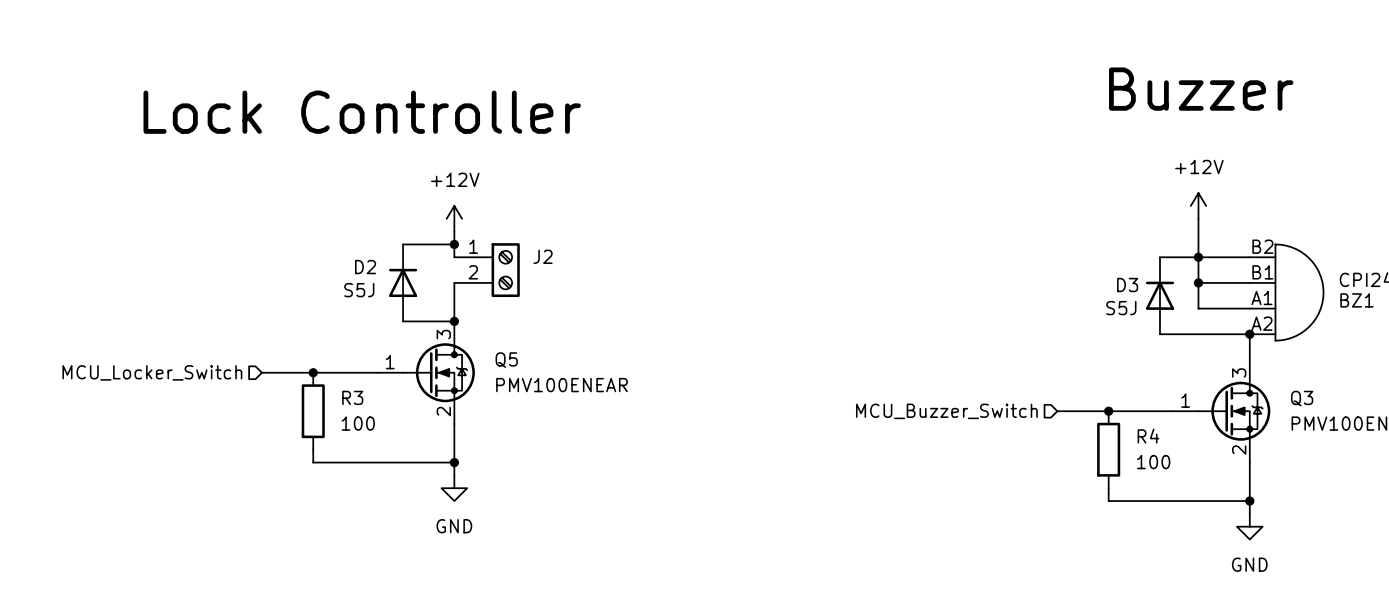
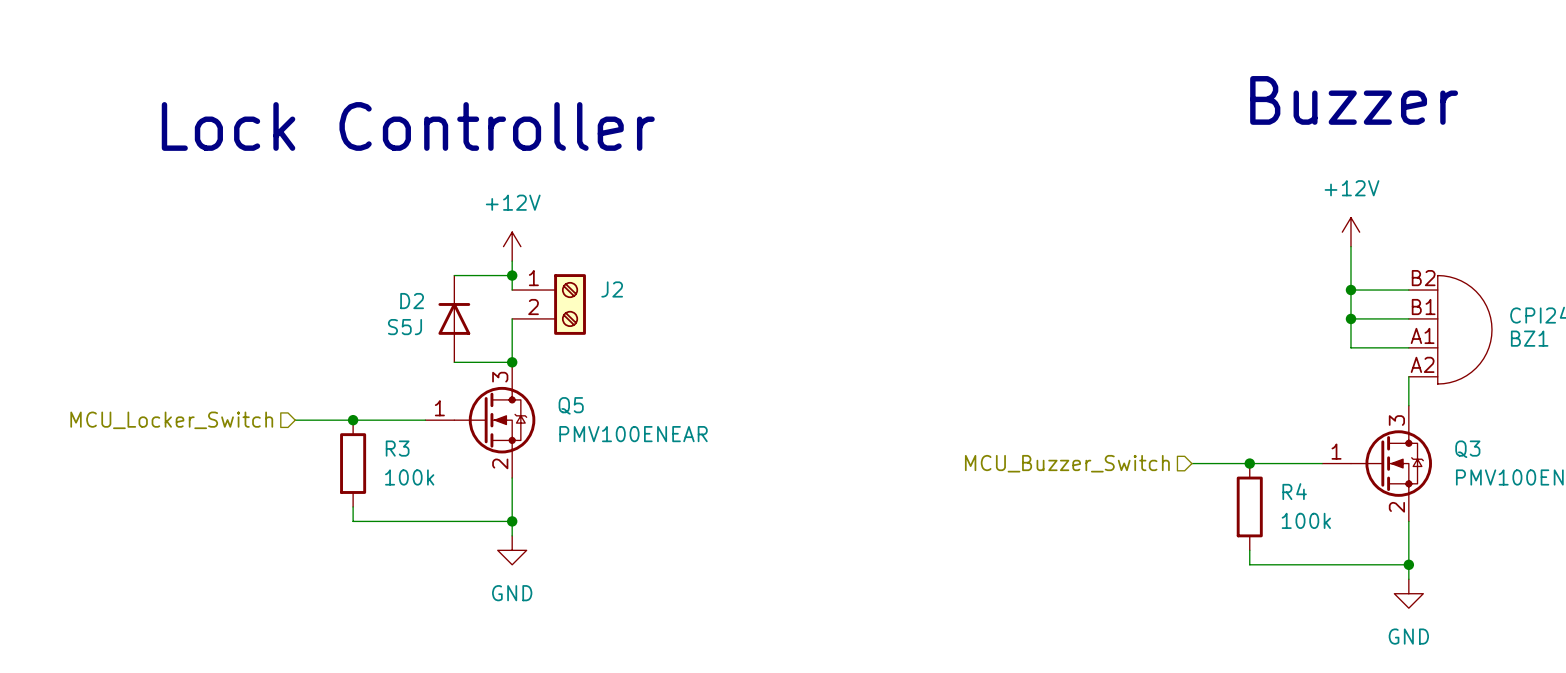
wire: (1159, 257) (1198, 257) -> none
D3: S5J (1159, 295) -> none
wire: (1159, 334) (1249, 334) -> none
junction: (1249, 334) -> none
R3 value: 100 (358, 423) -> 100k (409, 477)
R4 value: 100 (1153, 462) -> 100k (1306, 520)

